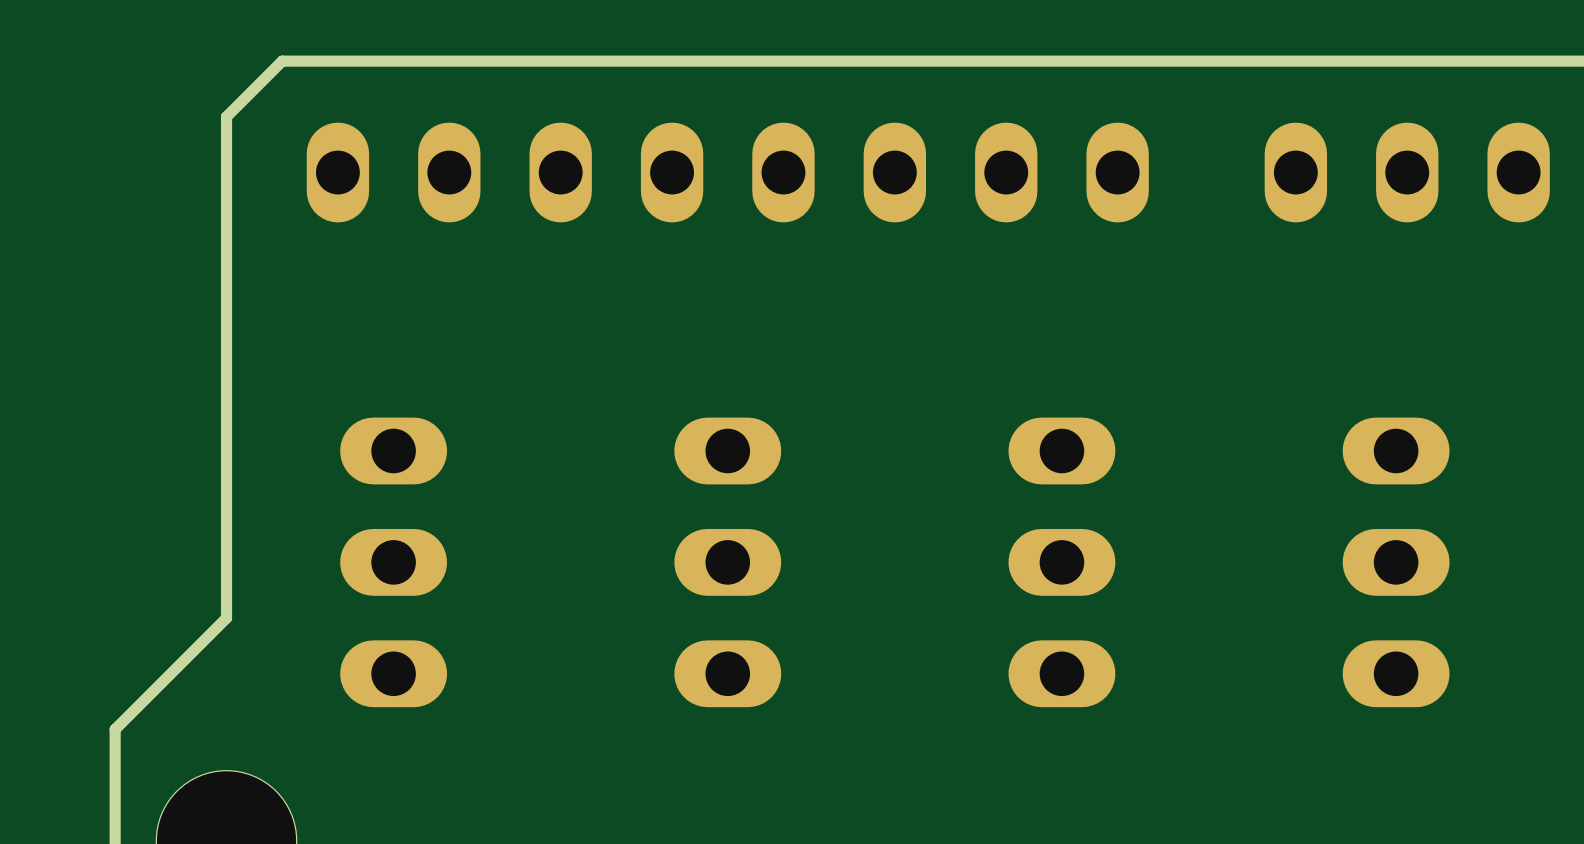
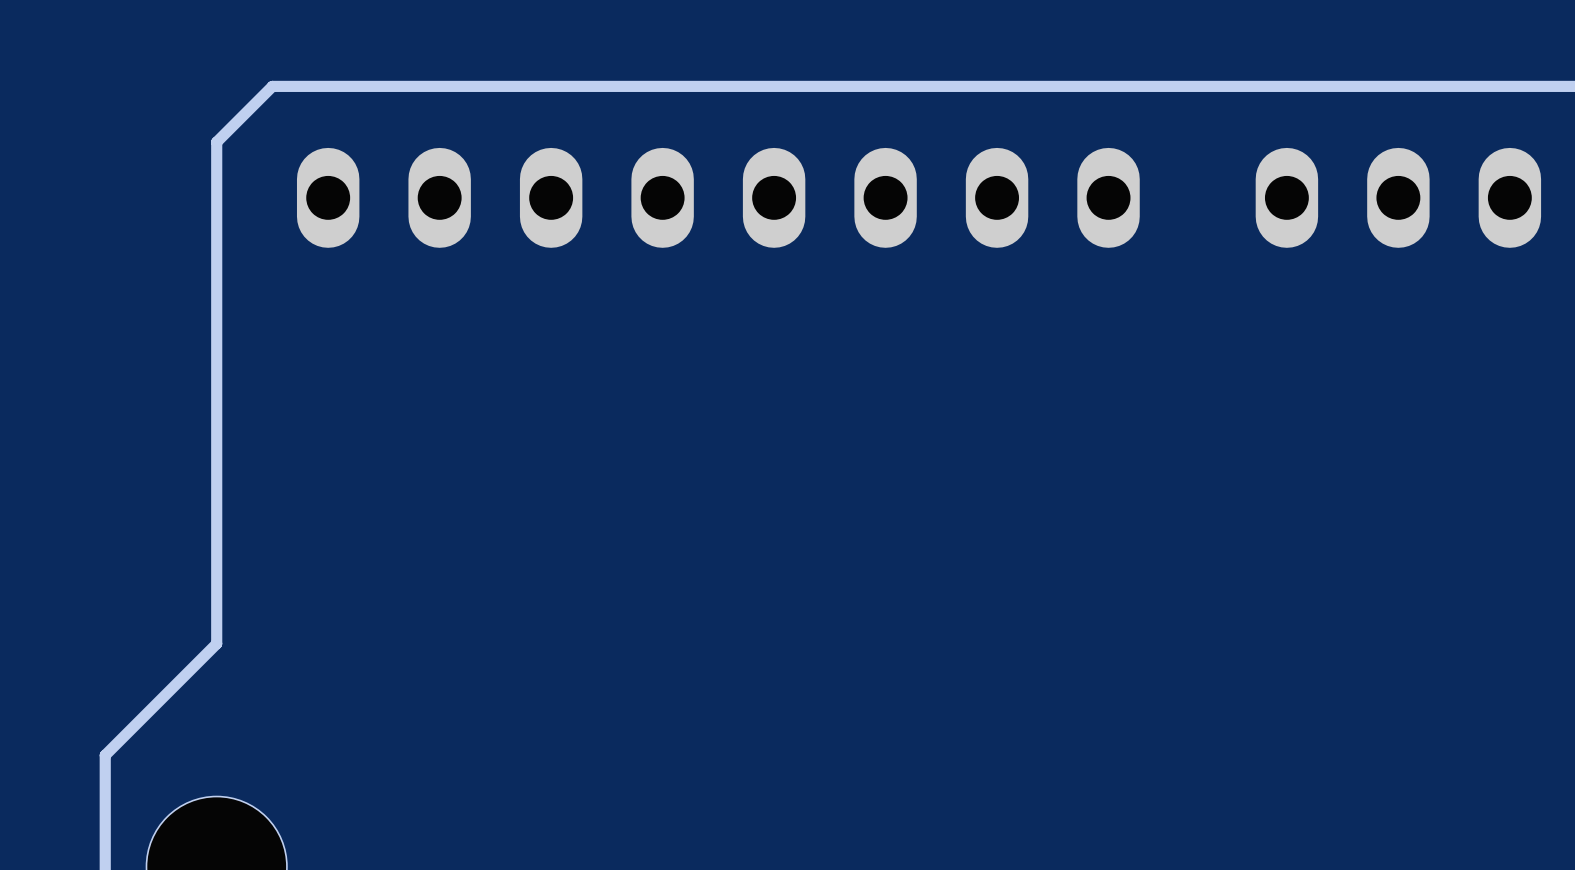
part: (393, 562) -> none
part: (727, 562) -> none
part: (1061, 562) -> none
part: (1396, 562) -> none

